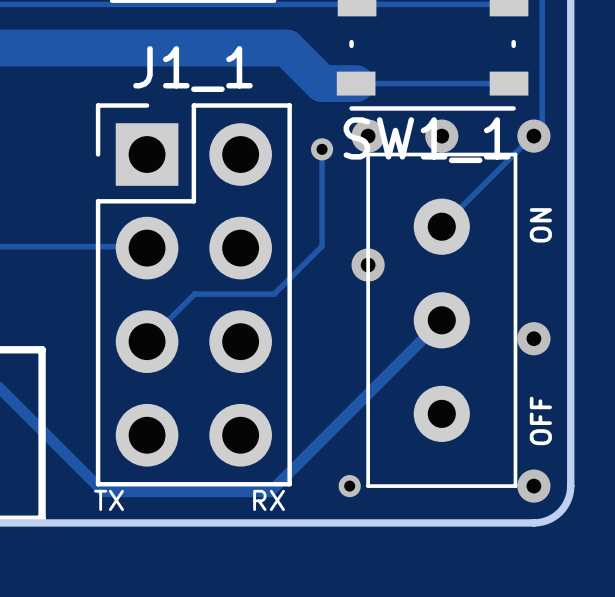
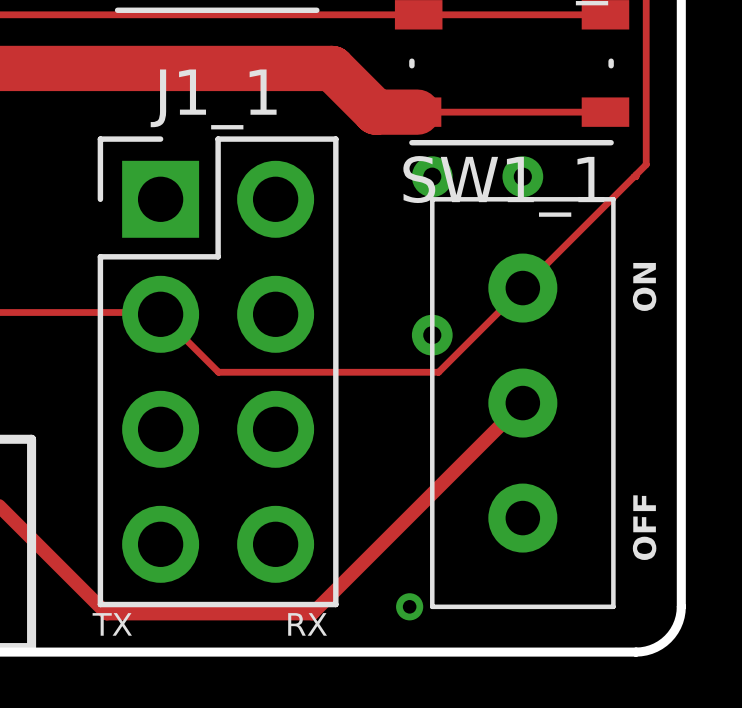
via: (533, 136) -> none
track: (322, 149) (322, 246) (274, 294) (194, 294) (147, 341) -> none
via: (322, 149) -> none
track: none -> (522, 288) (438, 372) (218, 372) (160, 314)
via: (533, 338) -> none
via: (533, 486) -> none

